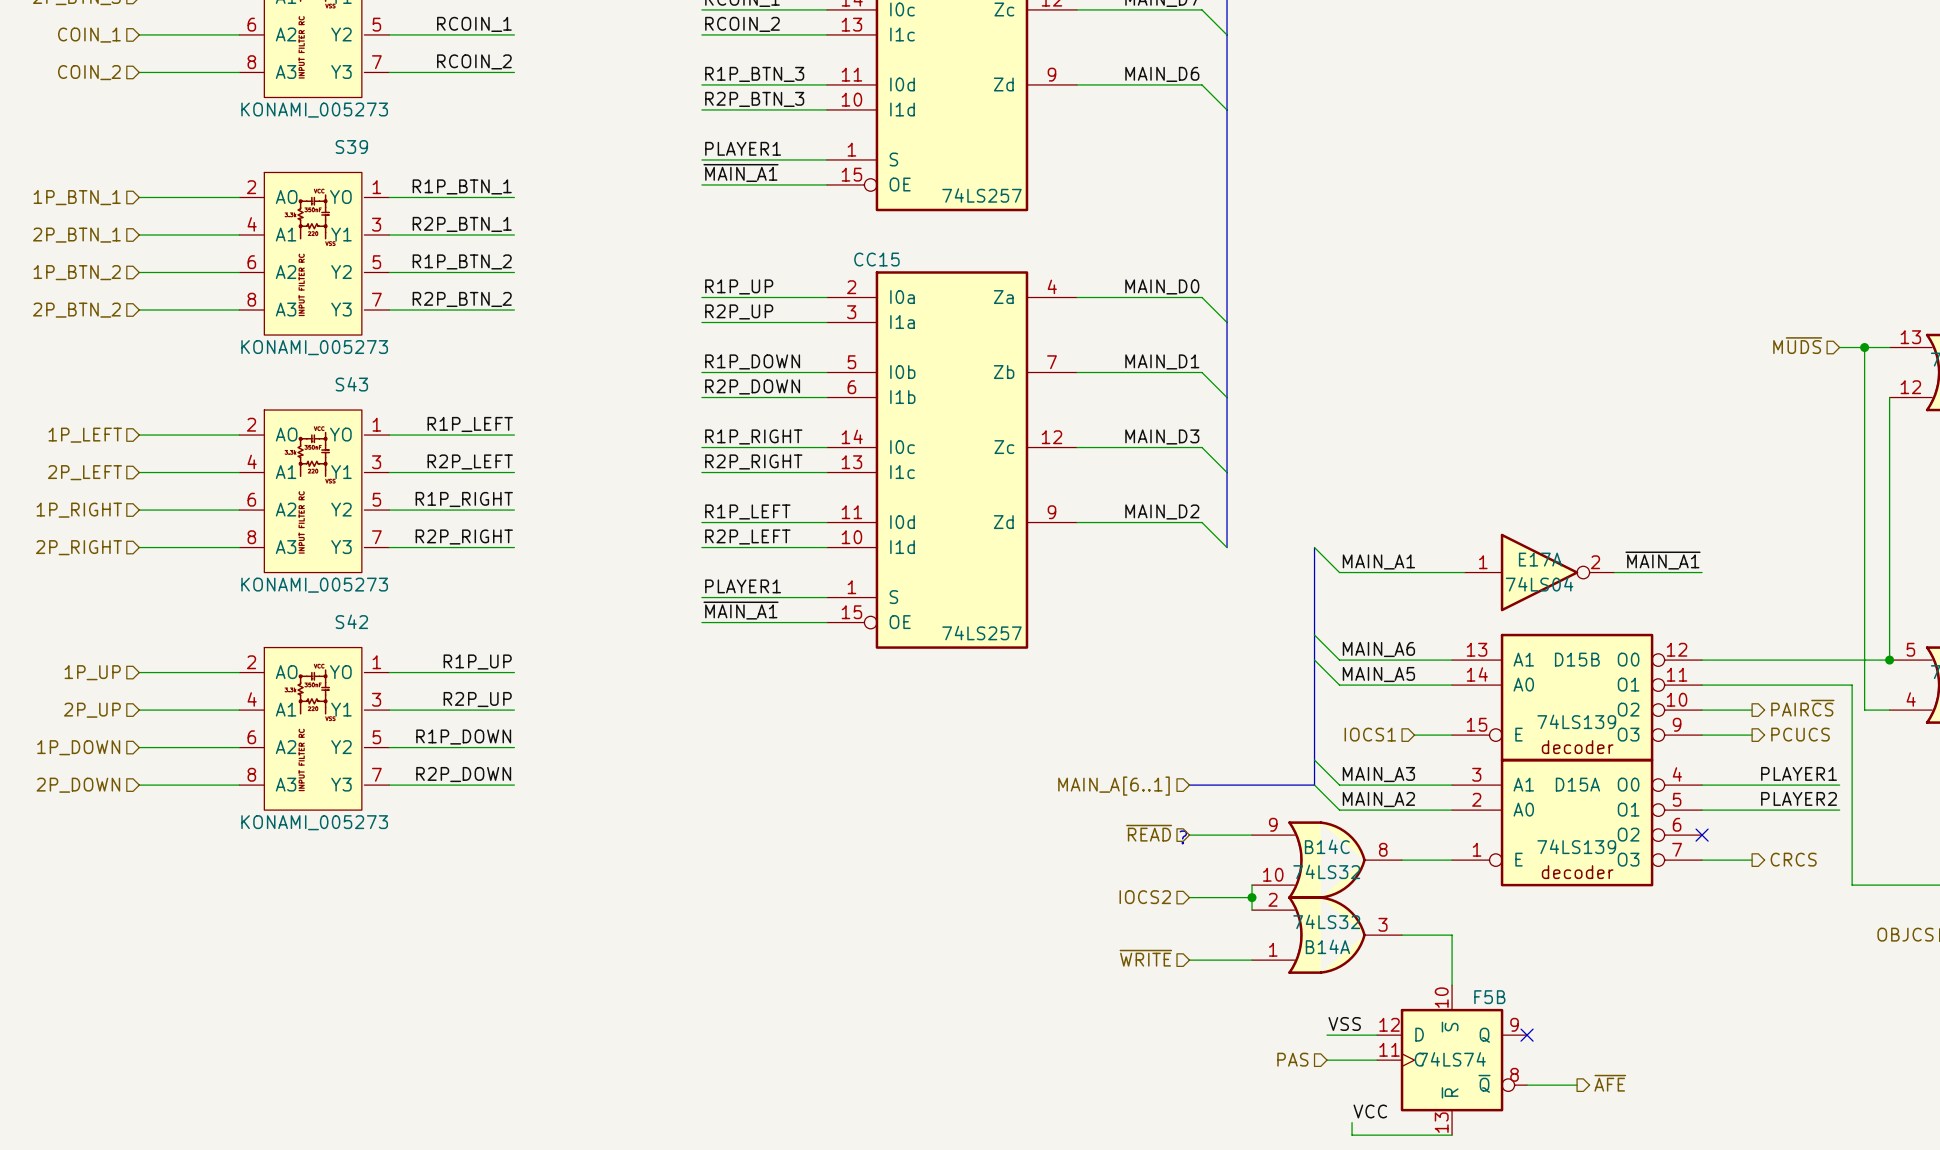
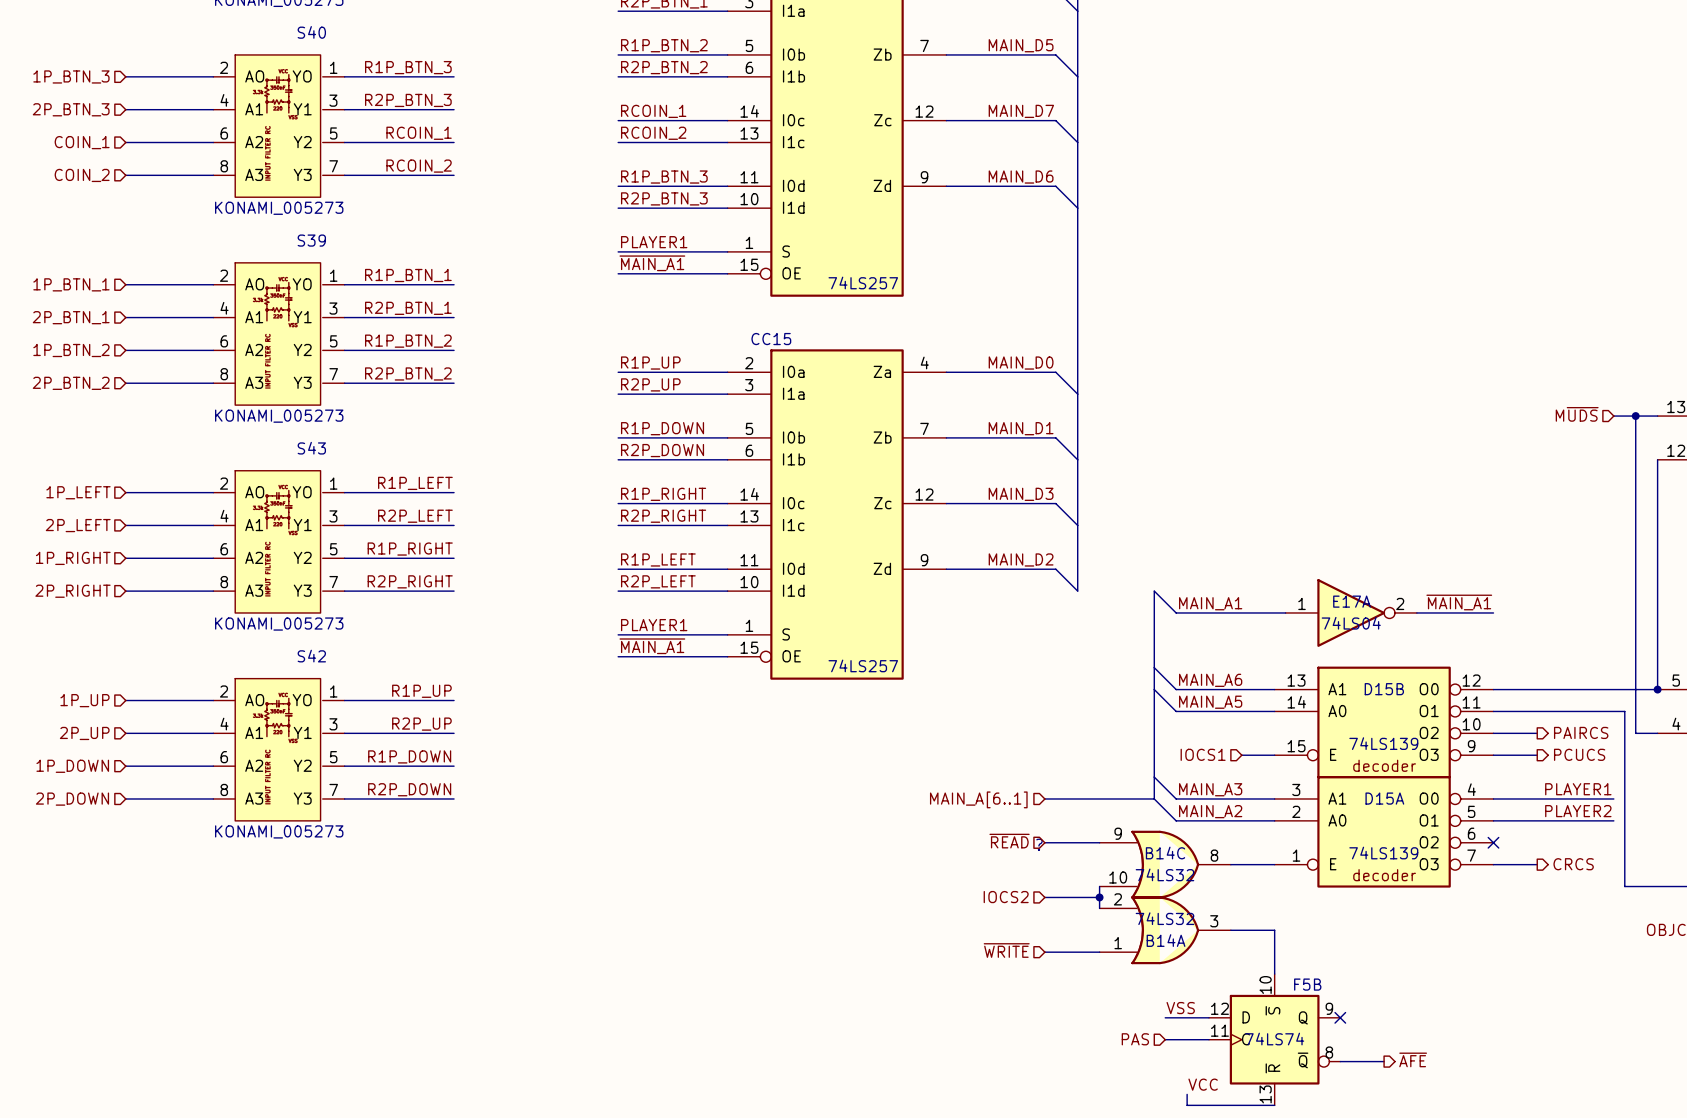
hierarchical label: PAIR~{CS} (1802, 708) -> PAIRCS (1581, 732)

